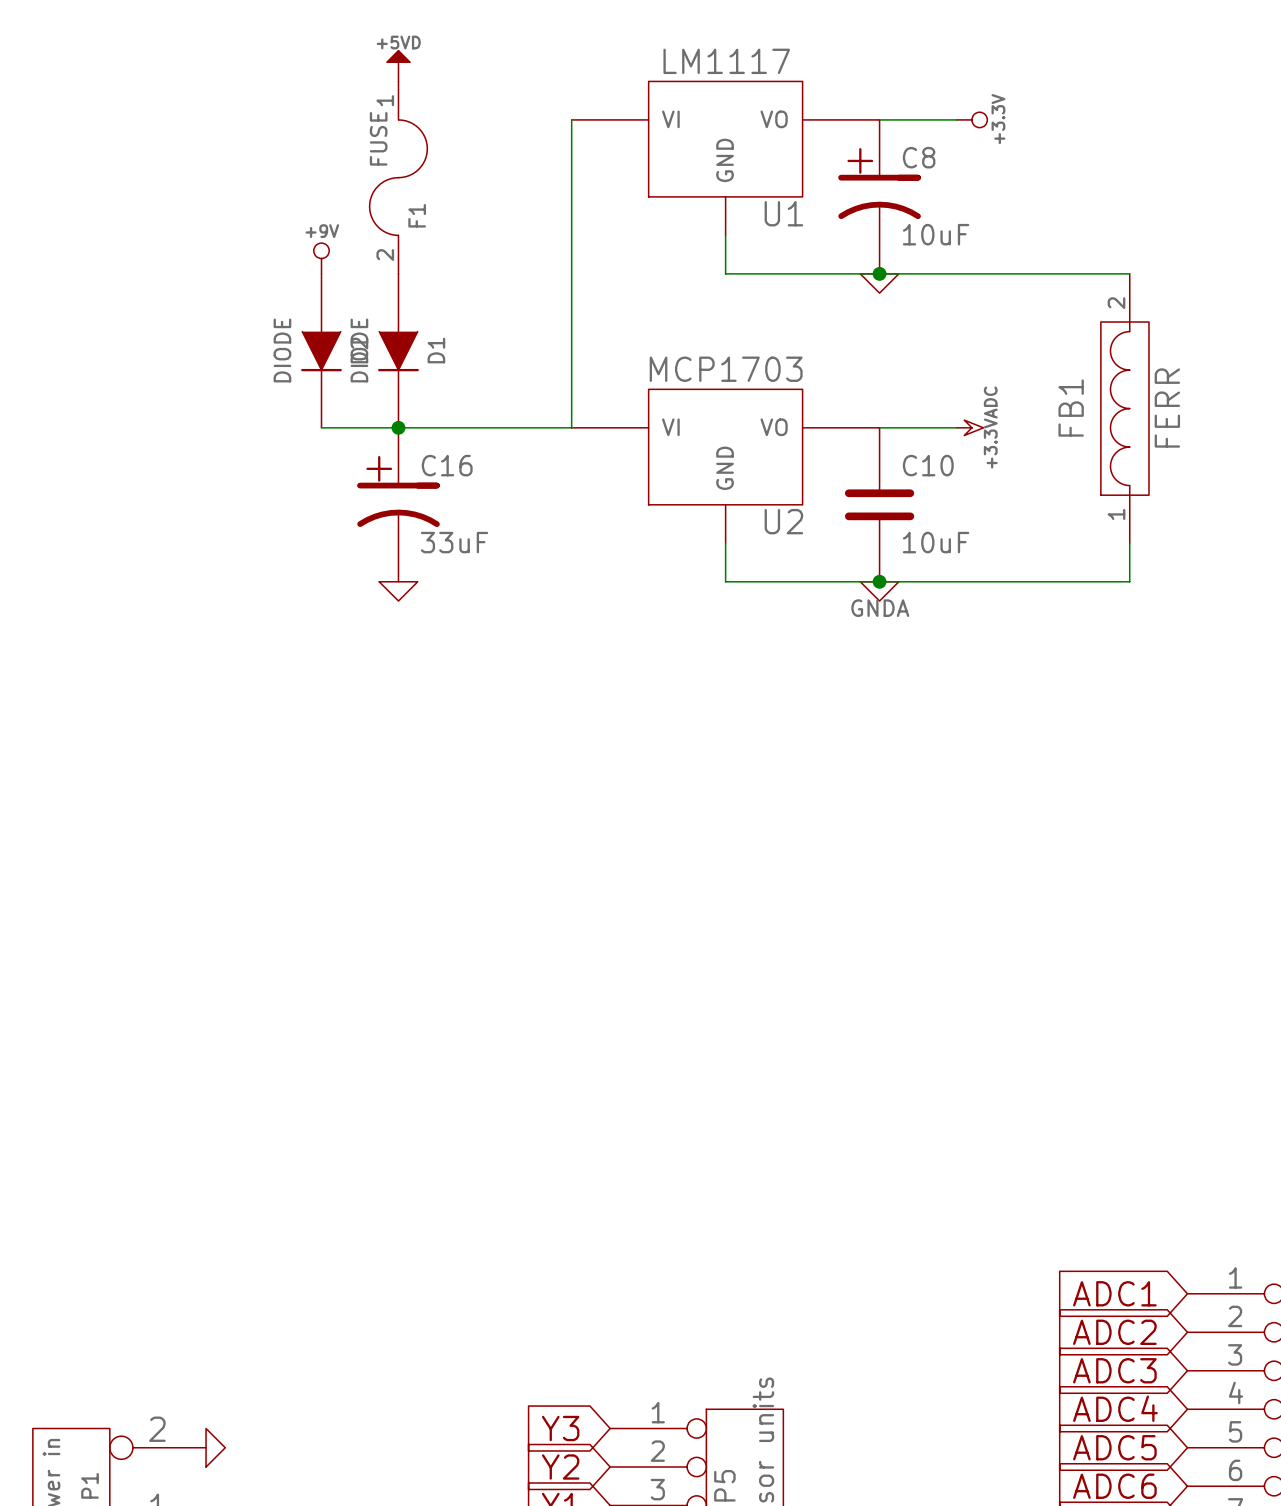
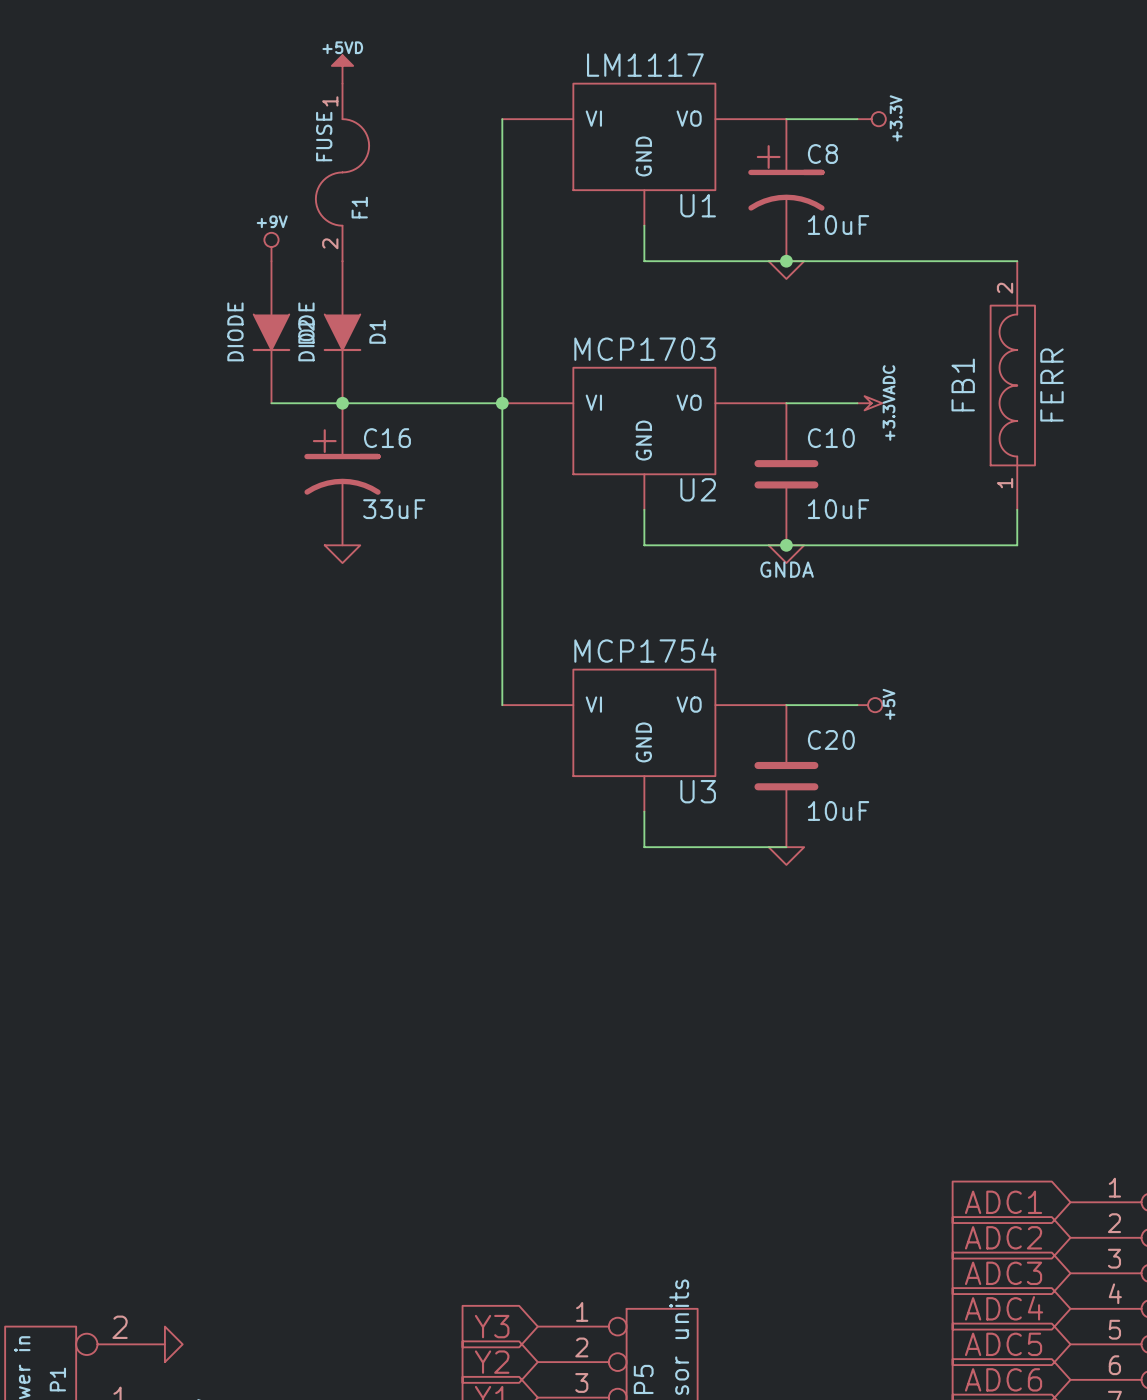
wire: none -> (502, 403) (502, 705)
junction: none -> (502, 403)
wire: none -> (786, 705) (857, 705)
power symbol: none -> +5V (869, 705)
U3: none -> MCP1754 (644, 740)
C20: none -> 10uF (786, 776)
wire: none -> (644, 811) (644, 847) (786, 847)
power symbol: none -> (786, 856)

